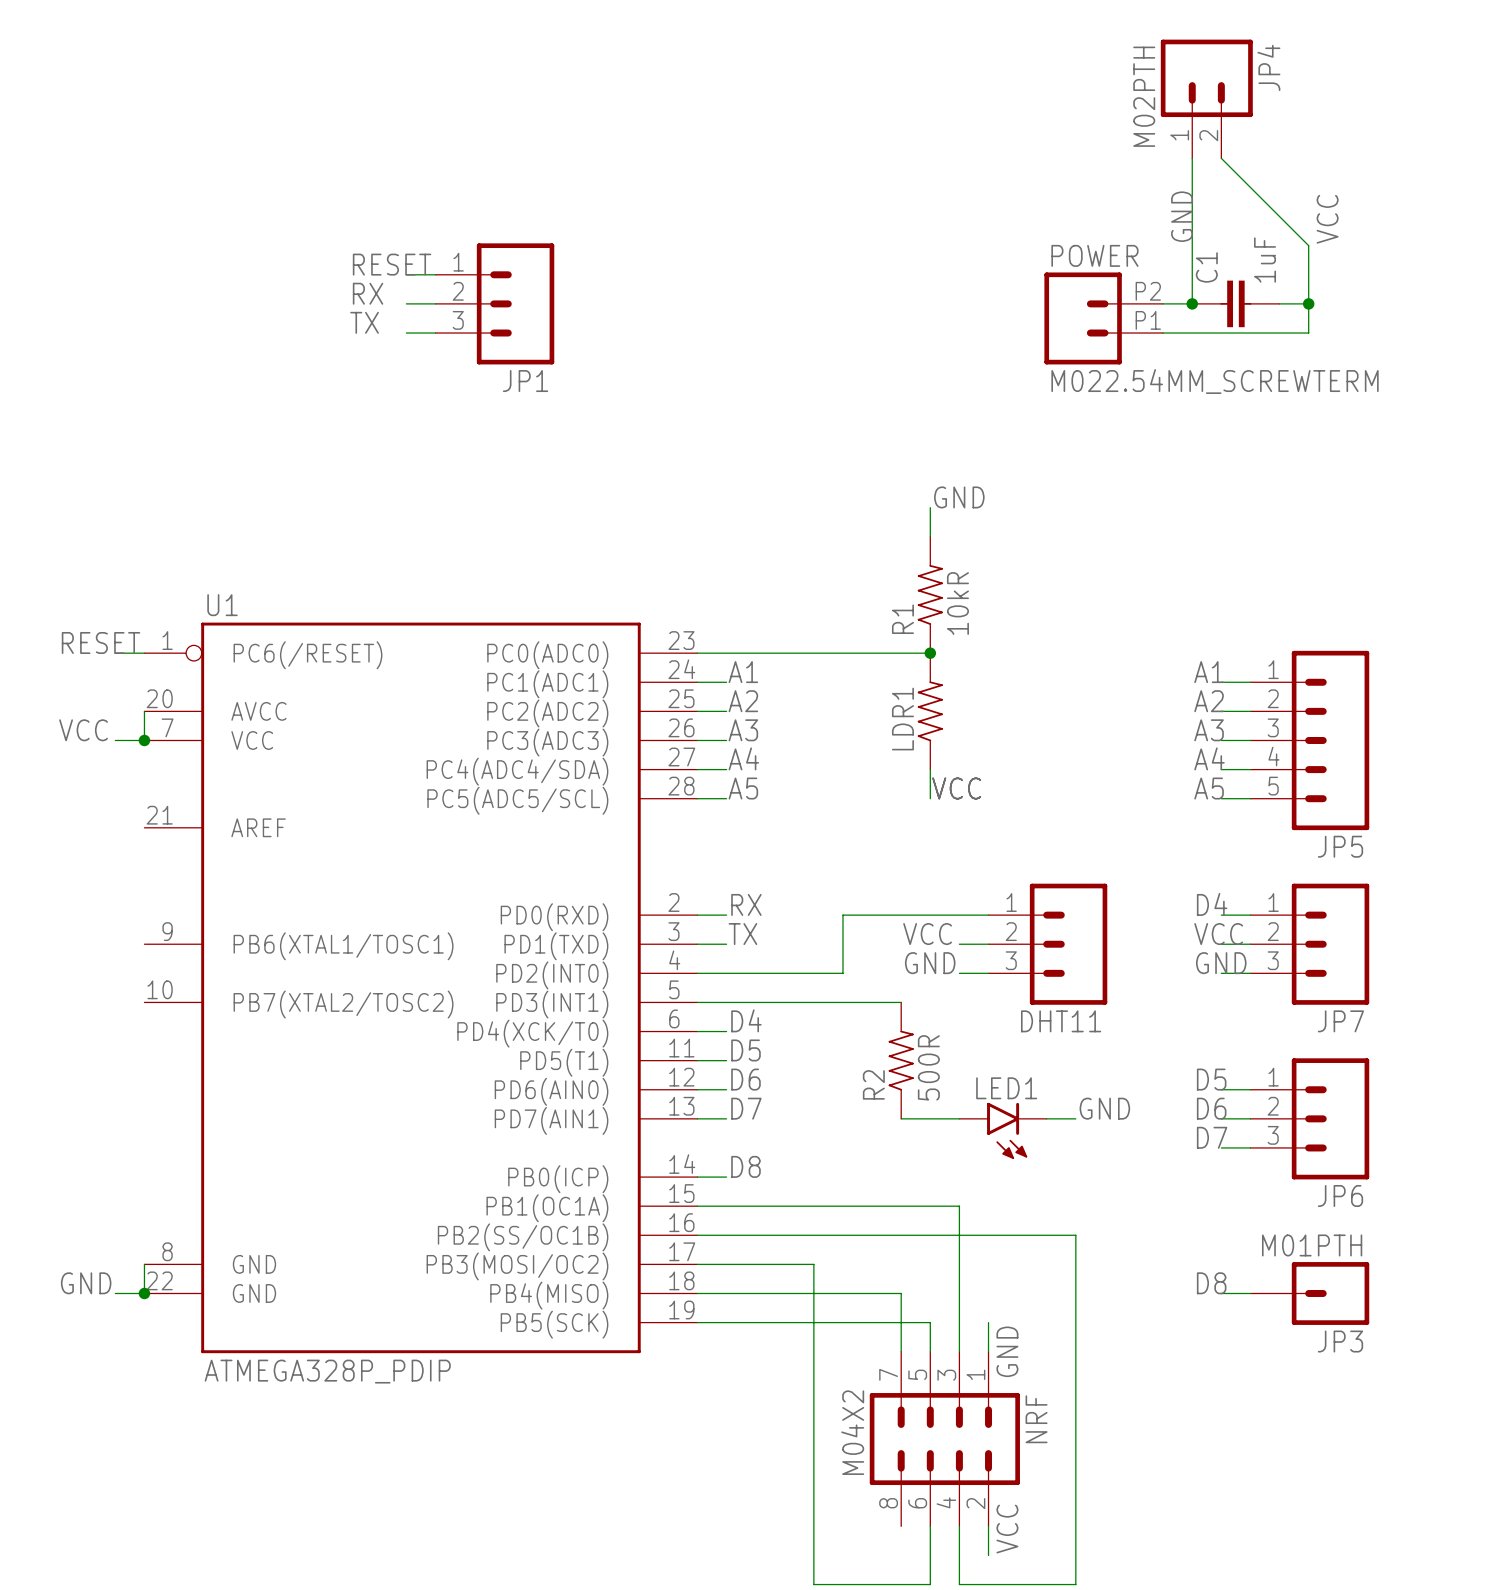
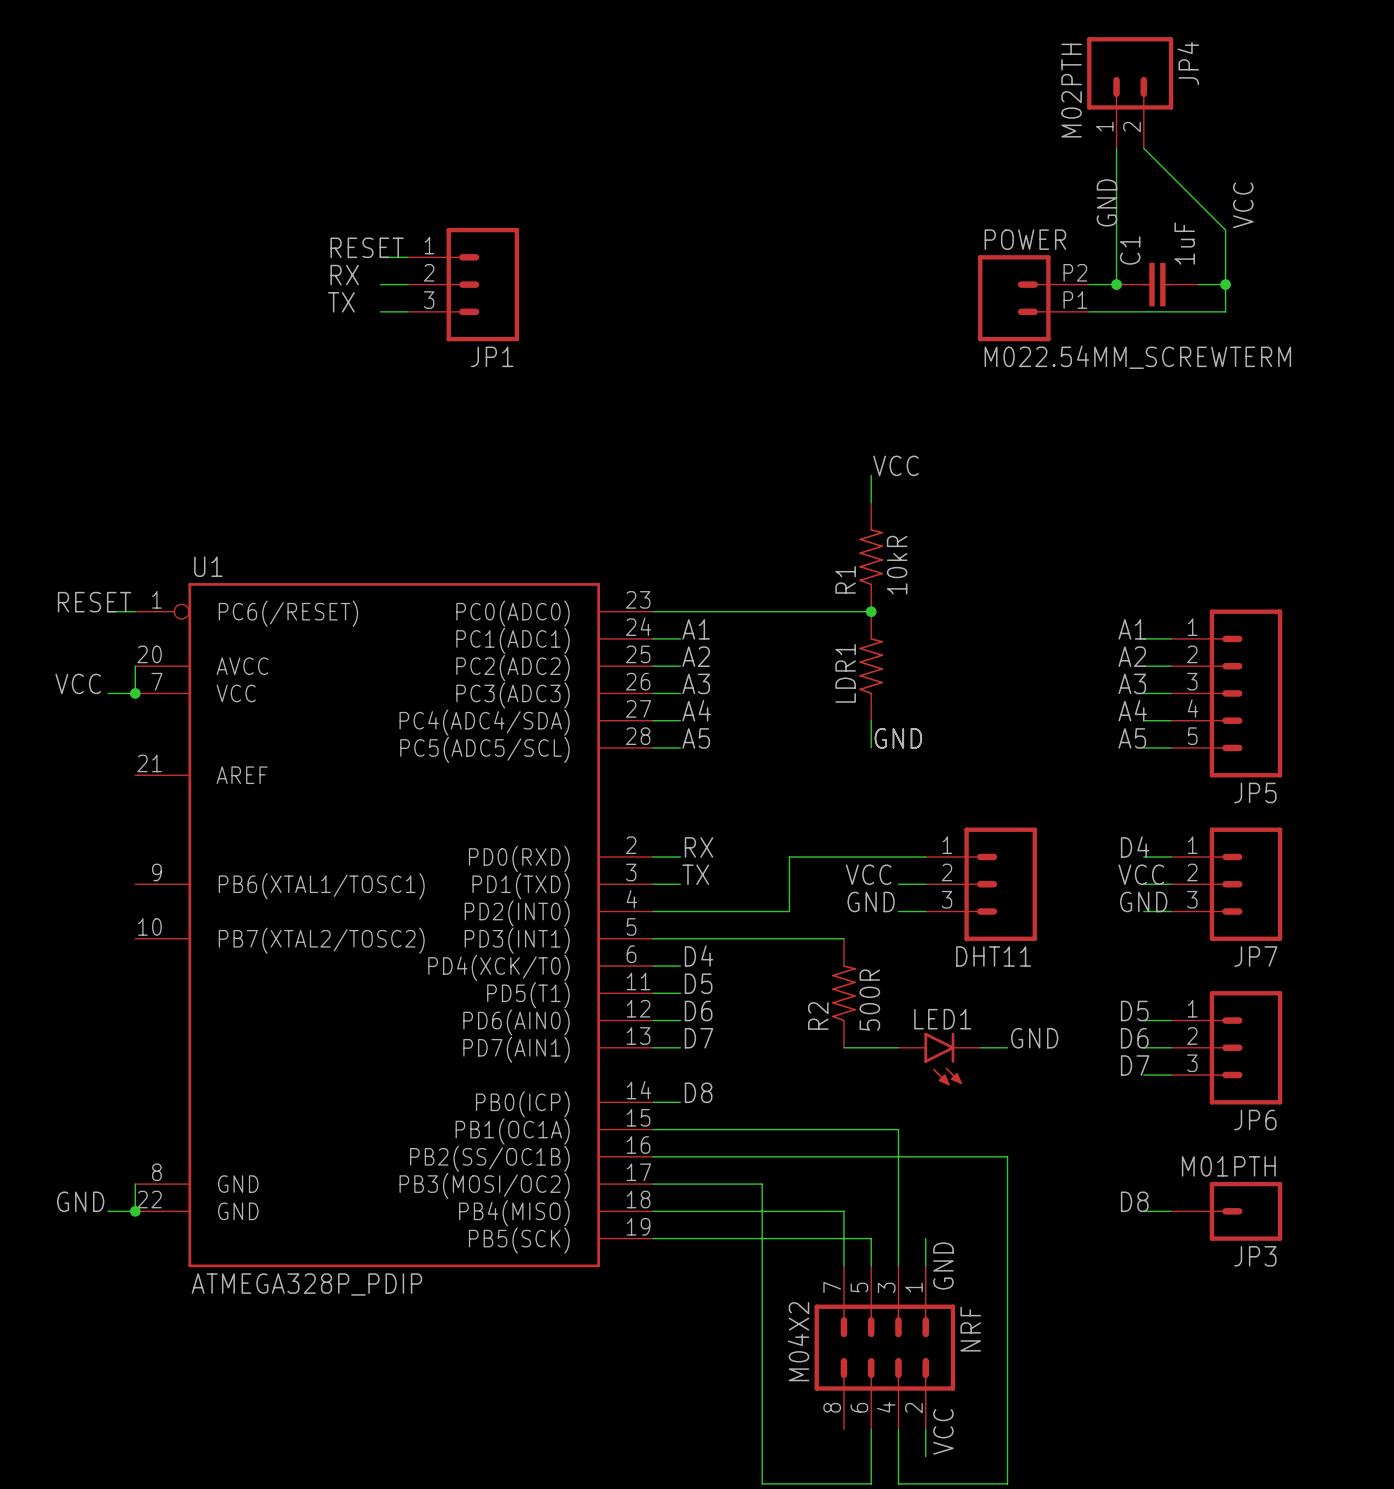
label: GND (959, 497) -> VCC (895, 465)
label: VCC (956, 788) -> GND (898, 738)

